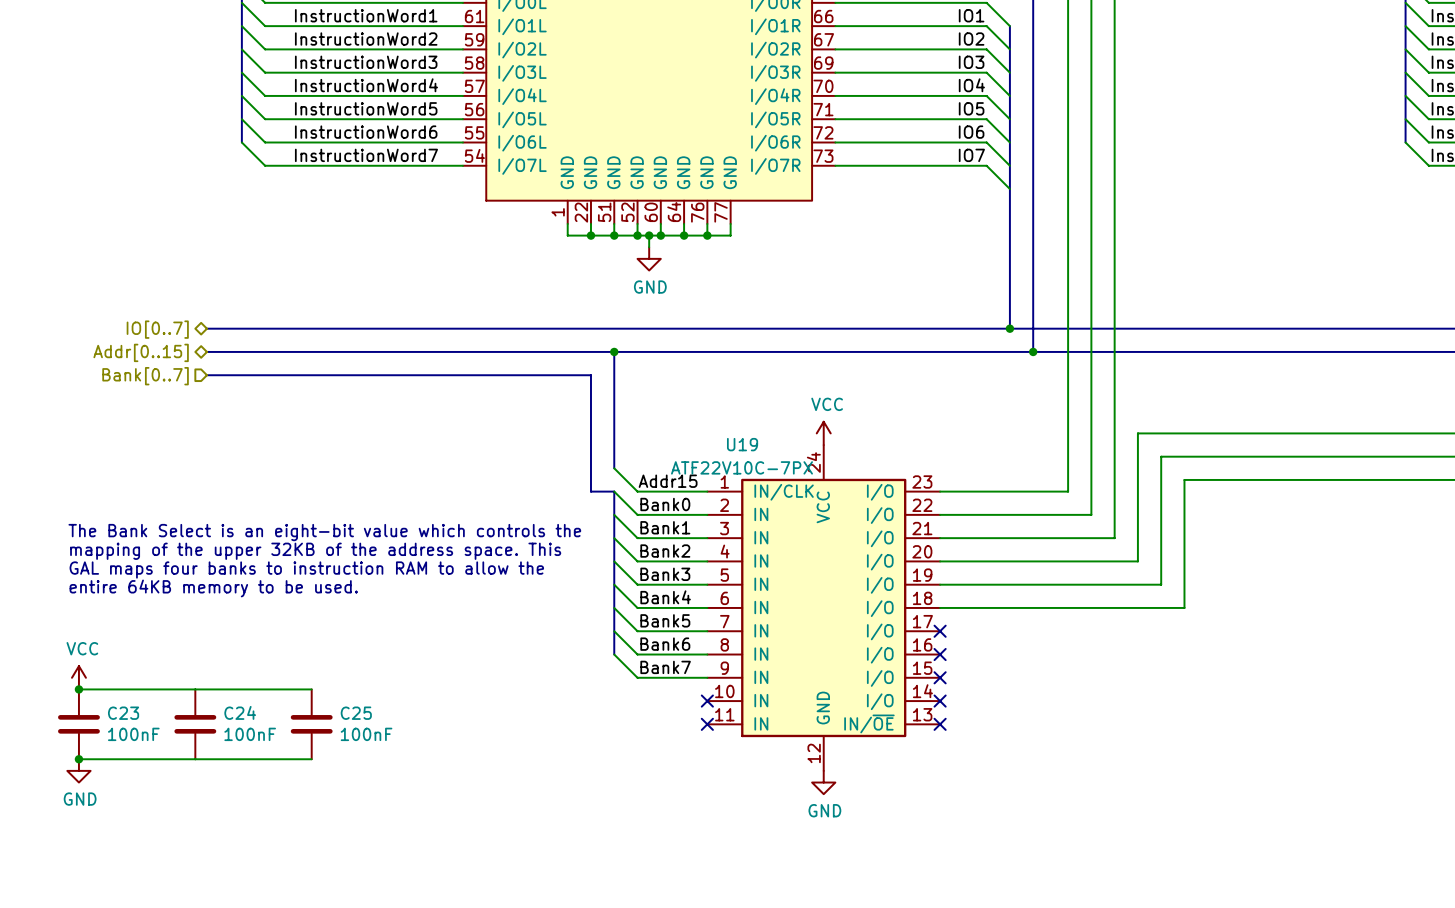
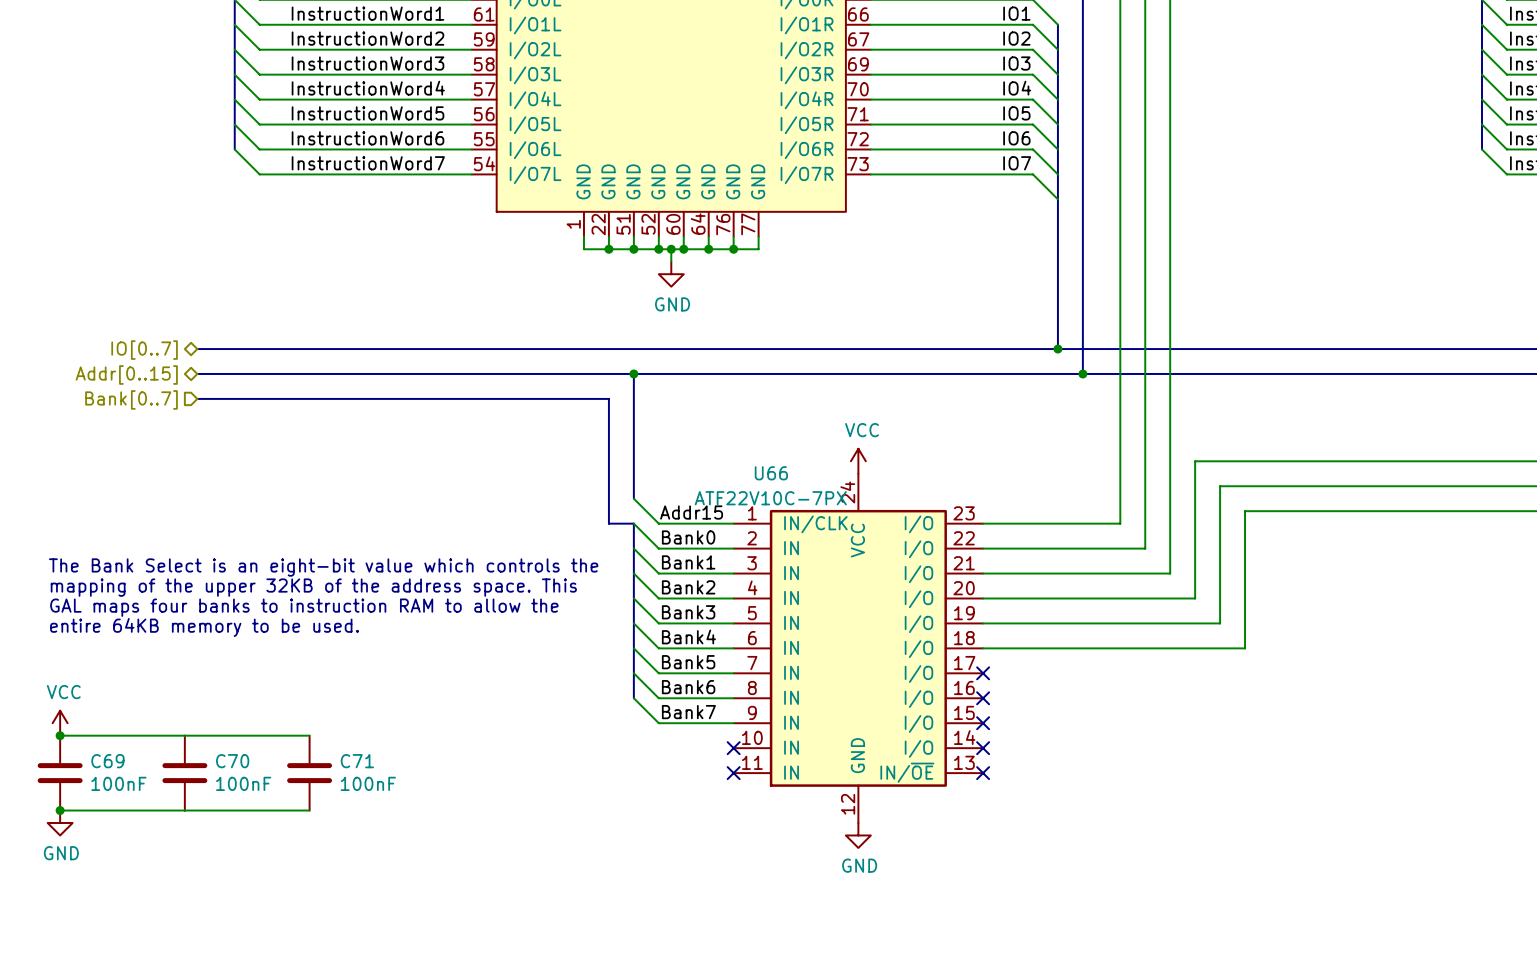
U19 name: U19 (742, 444) -> U66 (771, 473)
C24 name: C24 (240, 712) -> C70 (232, 761)
C23 name: C23 (123, 713) -> C69 (107, 761)
C25 name: C25 (356, 713) -> C71 (357, 761)

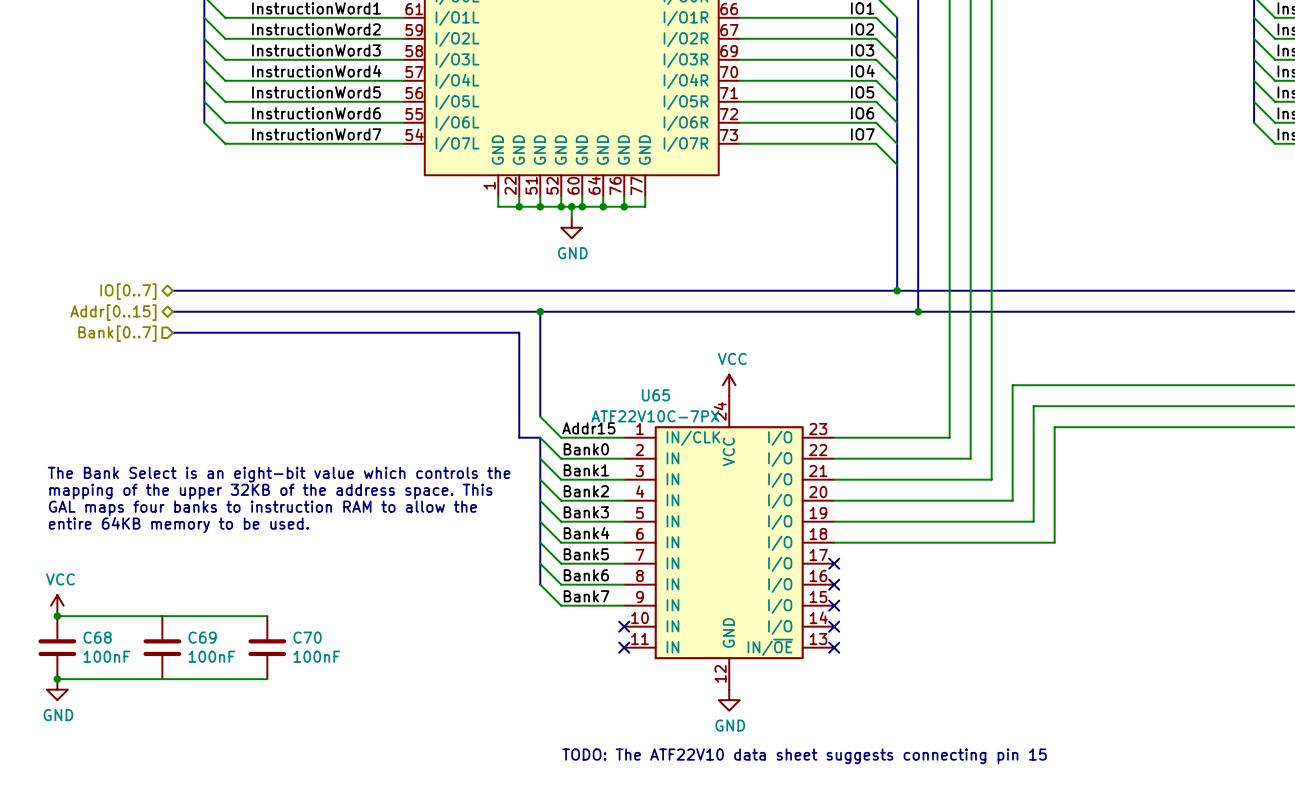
U66 name: U66 (771, 473) -> U65 (655, 395)
C69 name: C69 (107, 761) -> C68 (97, 637)
C70 name: C70 (232, 761) -> C69 (202, 637)
C71 name: C71 (357, 761) -> C70 (307, 637)
text: none -> TODO: The ATF22V10 data sheet suggests connecting pin 15 (804, 756)

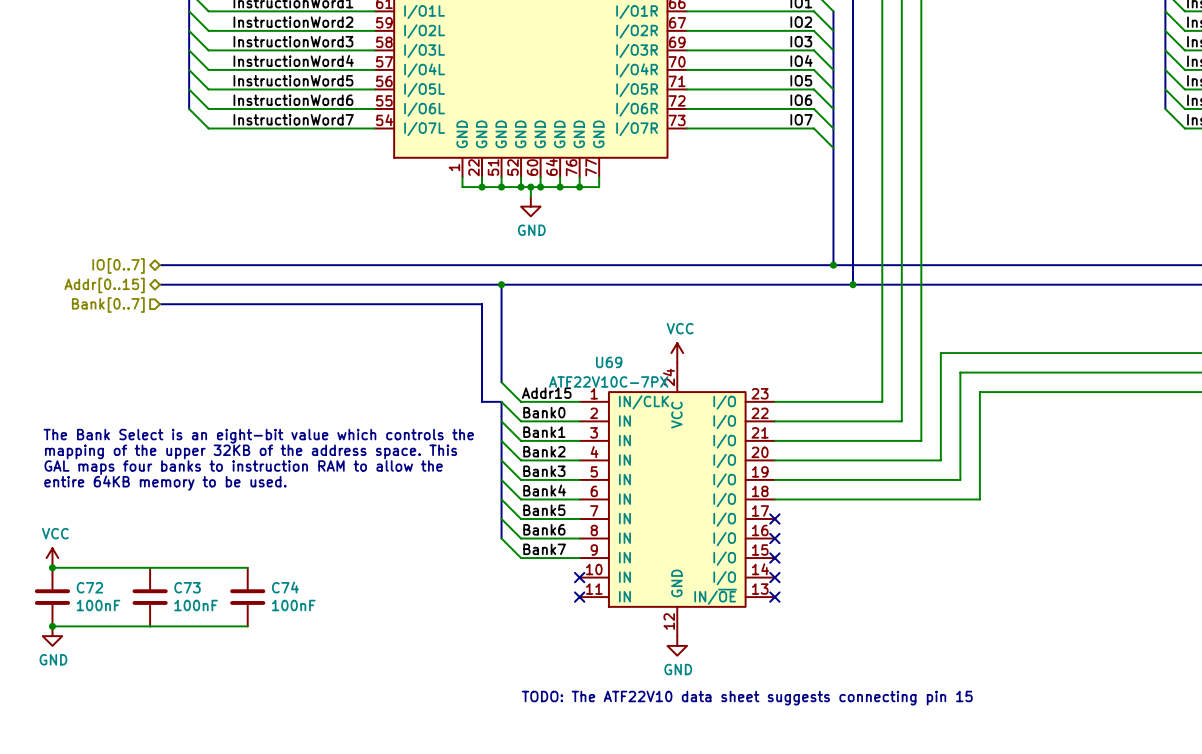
U65 name: U65 (655, 395) -> U69 (609, 362)
C68 name: C68 (97, 637) -> C72 (89, 587)
C69 name: C69 (202, 637) -> C73 (187, 587)
C70 name: C70 (307, 637) -> C74 (285, 587)

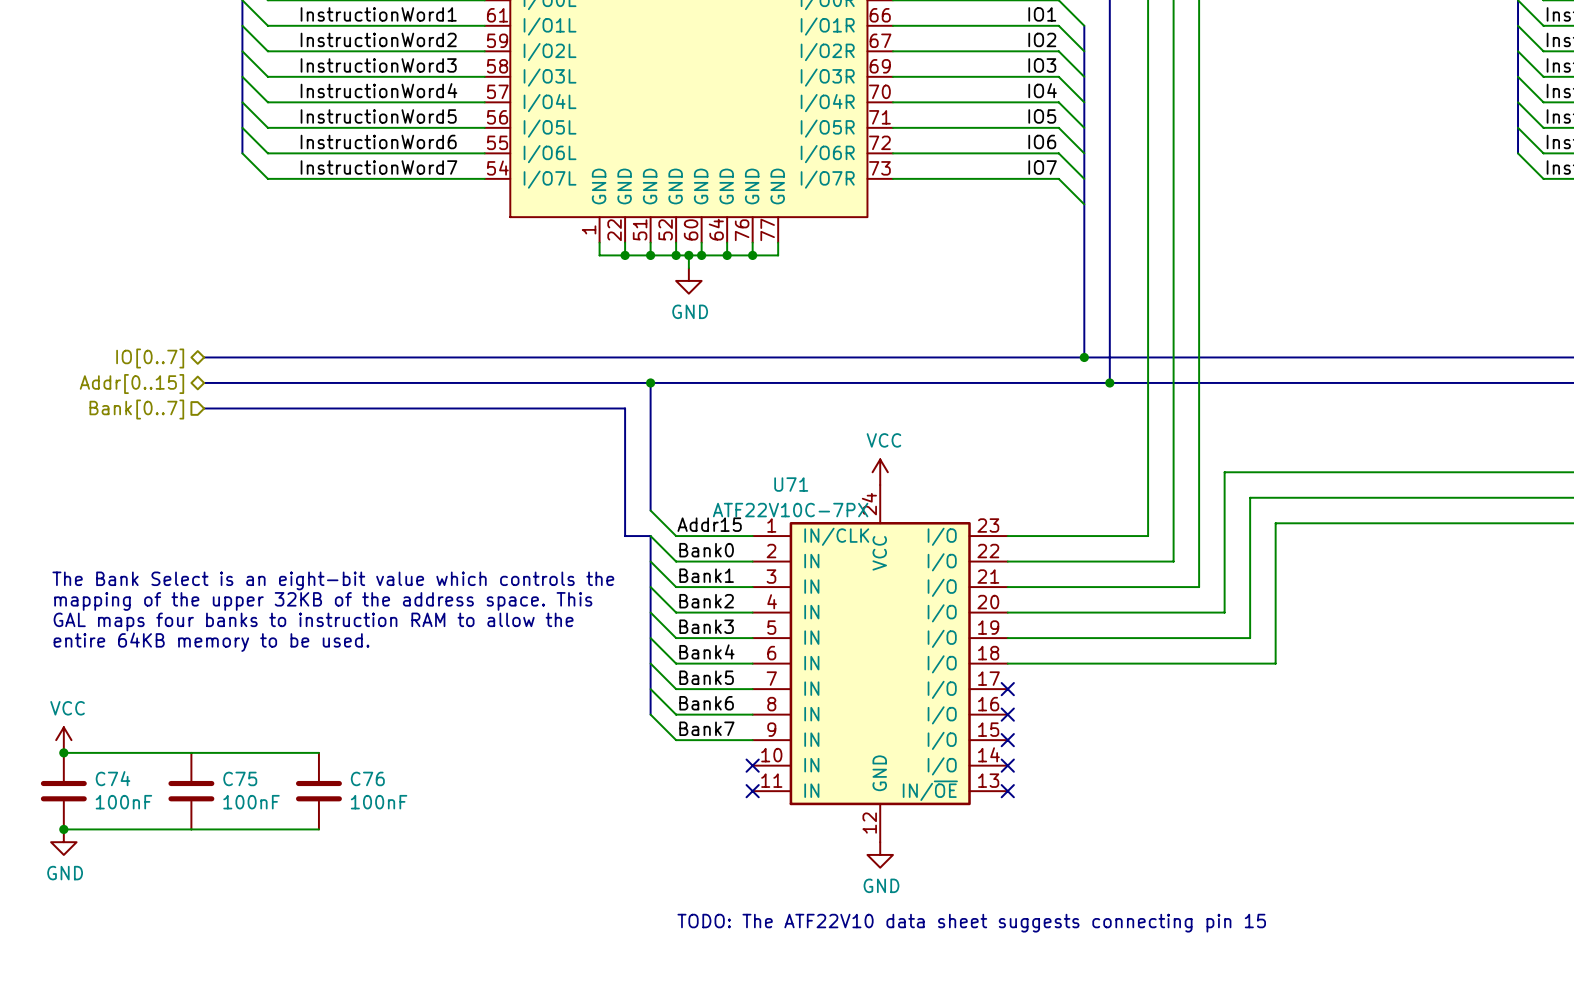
U69 name: U69 (609, 362) -> U71 (791, 484)
C72 name: C72 (89, 587) -> C74 (113, 778)
C73 name: C73 (187, 587) -> C75 (240, 778)
C74 name: C74 (285, 587) -> C76 (367, 778)

